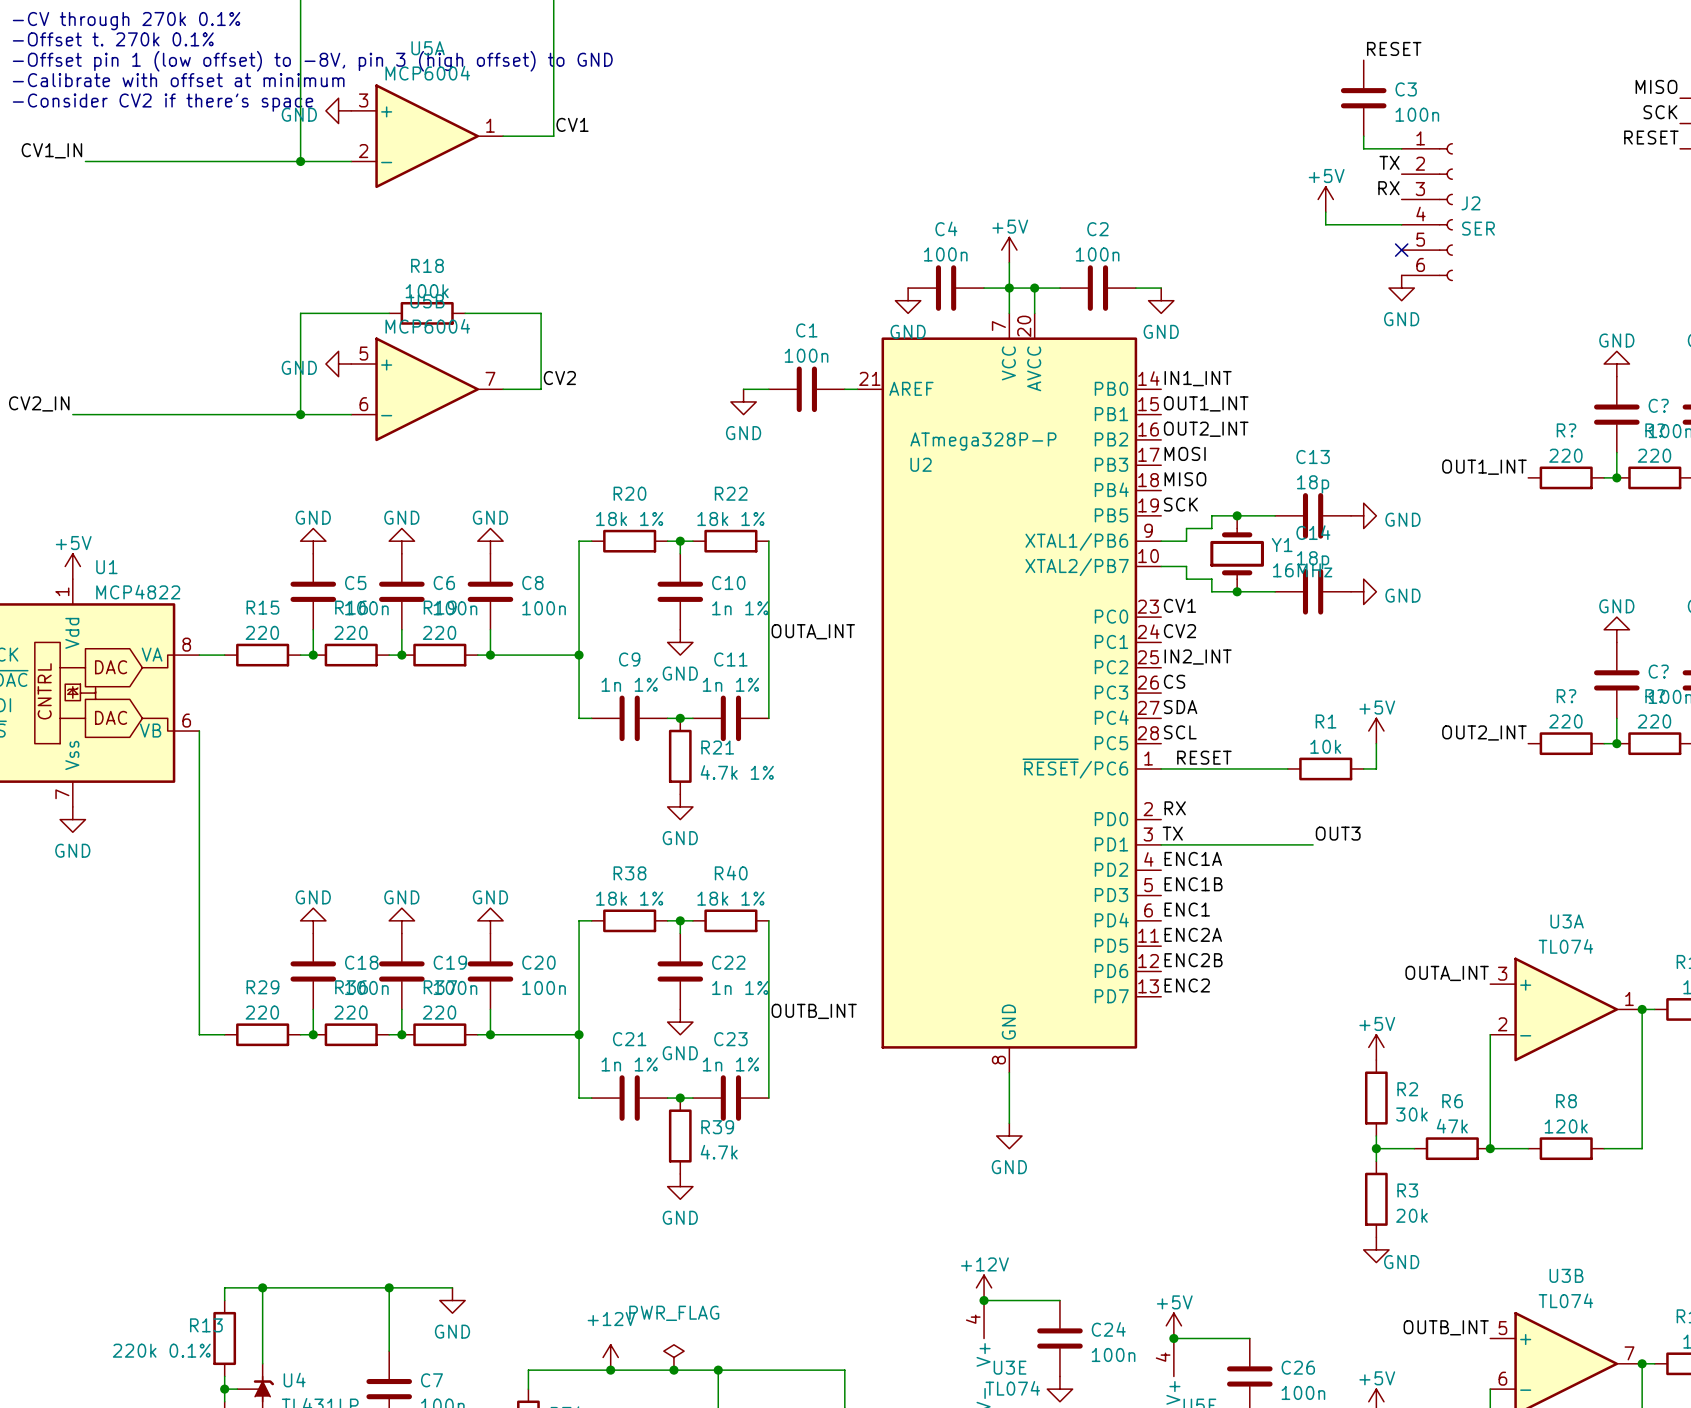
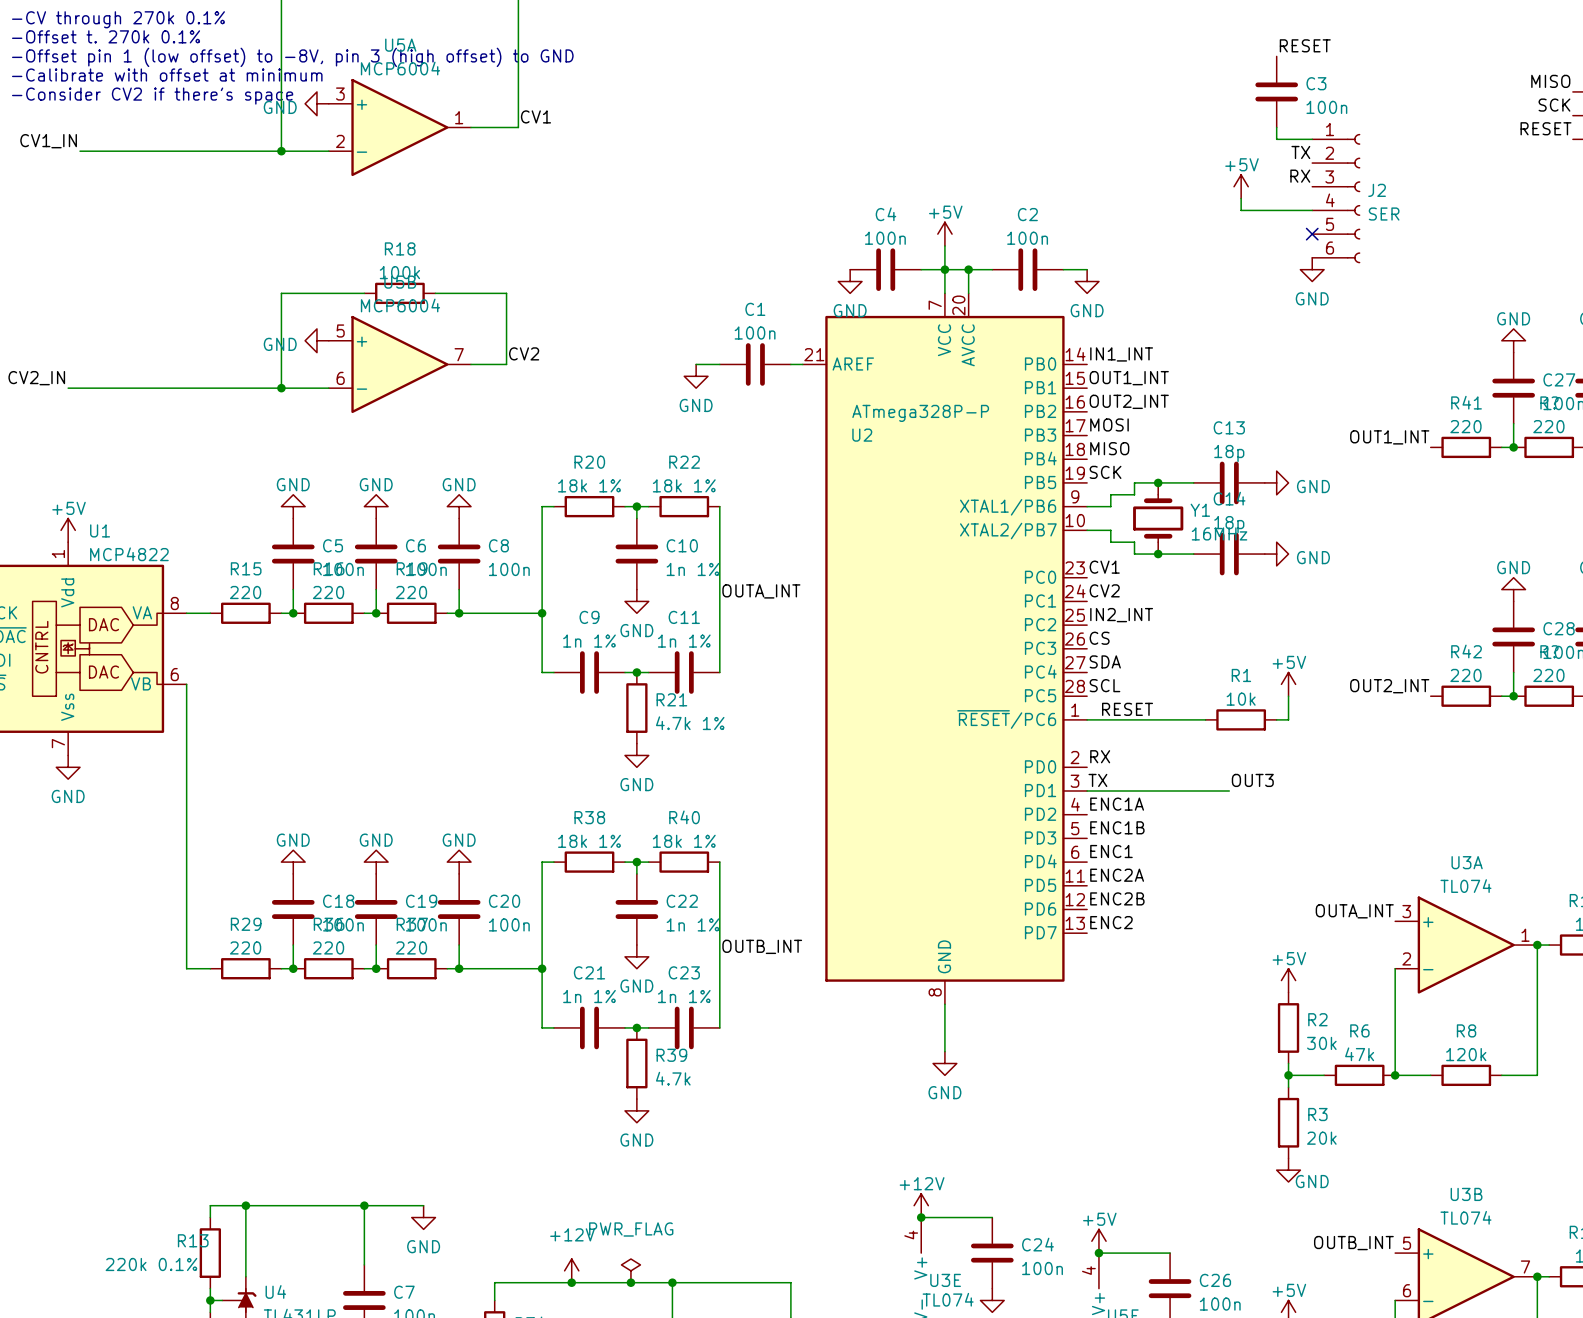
C? name: C? (1658, 405) -> C27 (1559, 379)
R? name: R? (1566, 430) -> R41 (1466, 402)
C? name: C? (1658, 671) -> C28 (1559, 628)
R? name: R? (1566, 696) -> R42 (1466, 651)

